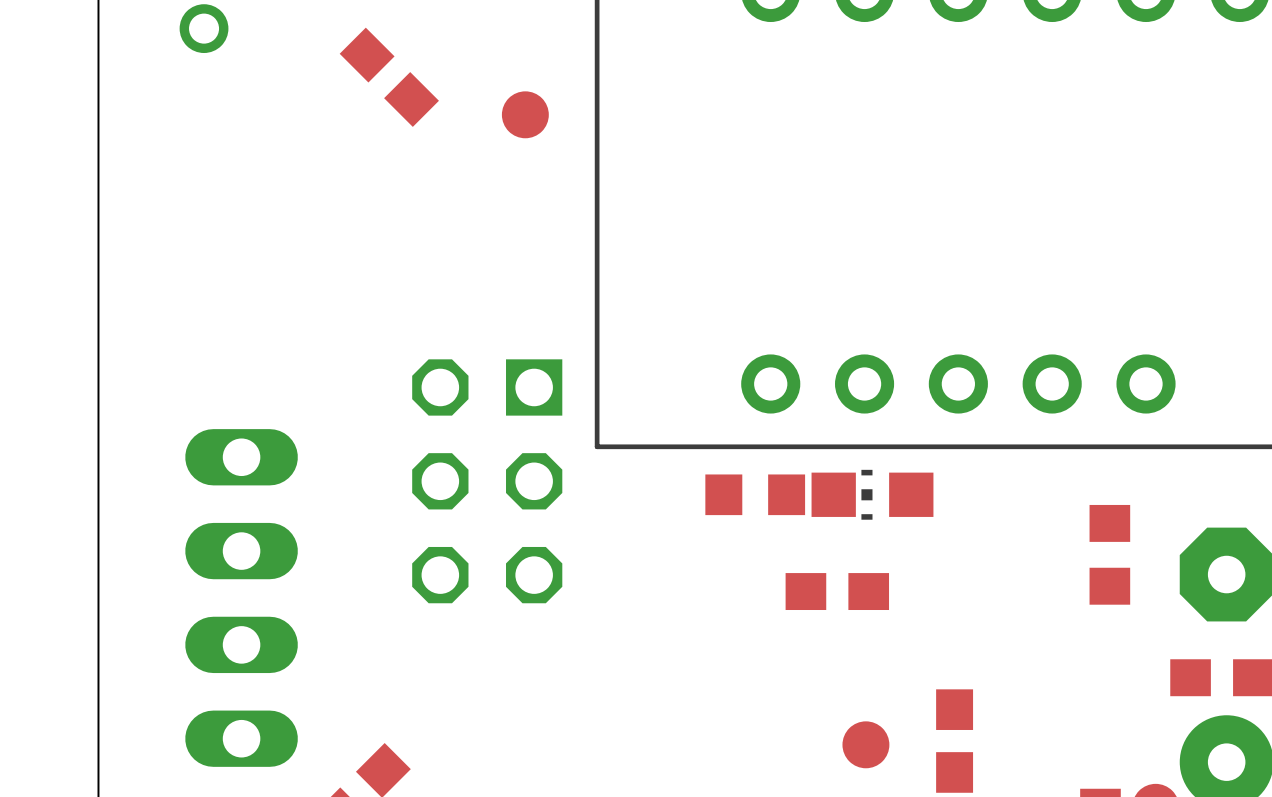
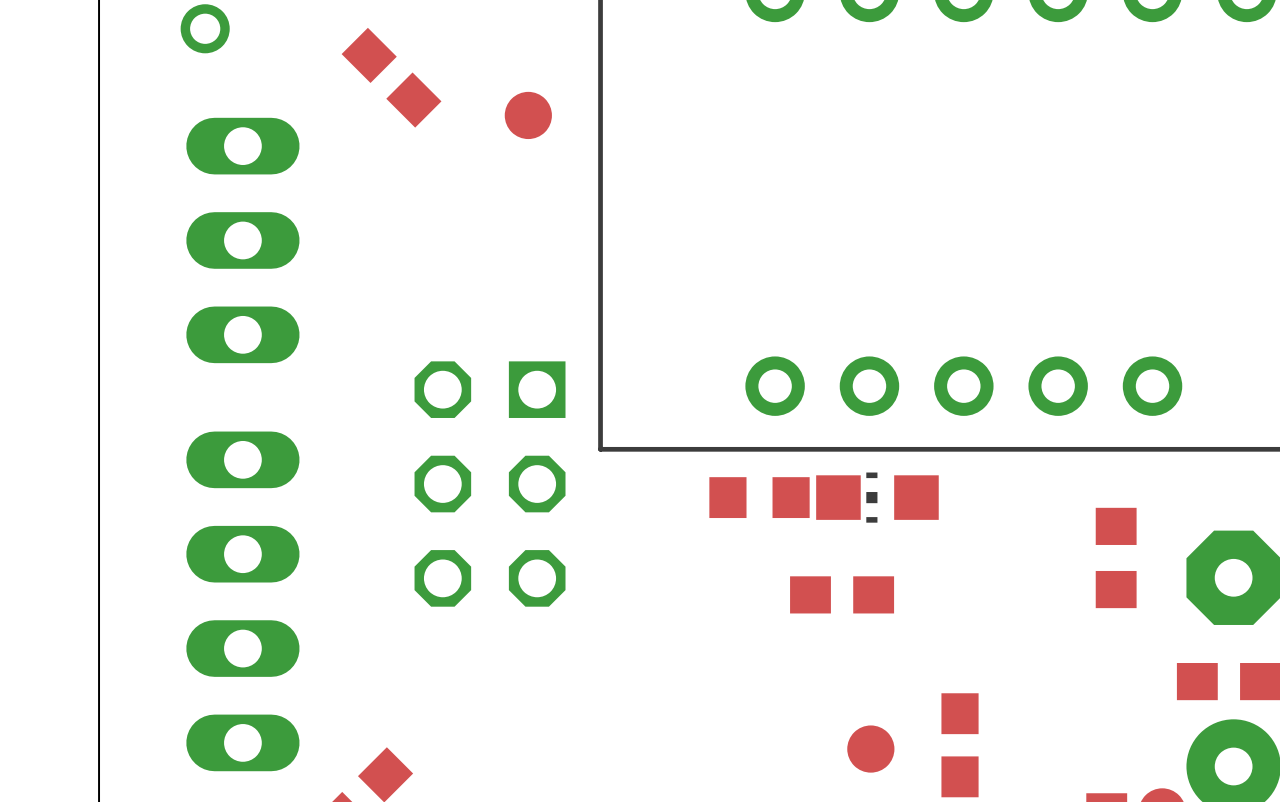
part: none -> (242, 240)

